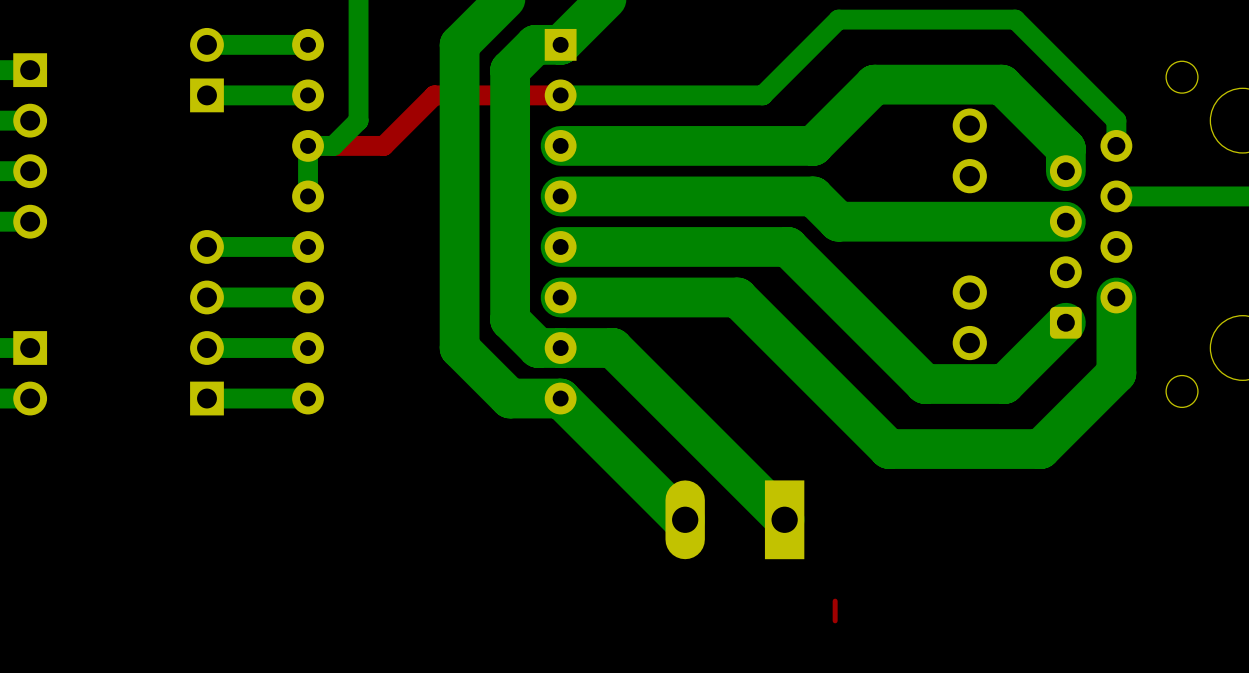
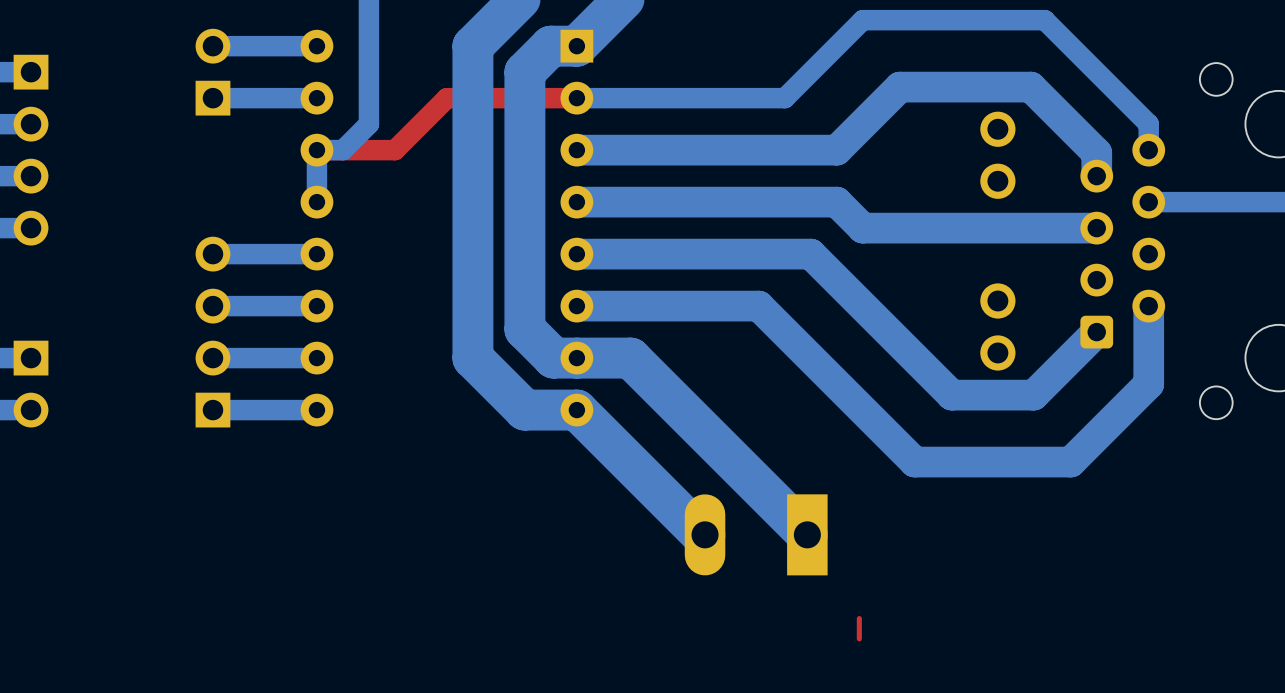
bottom track width: thick (560, 145) (813, 145) (874, 84) (1001, 84) (1065, 148) (1065, 171) -> thin (576, 150) (836, 150) (899, 87) (1030, 87) (1096, 152) (1096, 176)
bottom track width: thick (560, 196) (813, 196) (838, 221) (1065, 221) -> thin (576, 202) (836, 202) (862, 228) (1096, 228)
bottom track width: thick (560, 246) (787, 246) (925, 384) (1004, 384) (1065, 322) -> thin (576, 254) (810, 254) (951, 395) (1033, 395) (1096, 332)
bottom track width: thick (1116, 297) (1116, 373) (1040, 449) (889, 449) (737, 297) (560, 297) -> thin (1148, 306) (1148, 384) (1070, 462) (914, 462) (758, 306) (576, 306)

